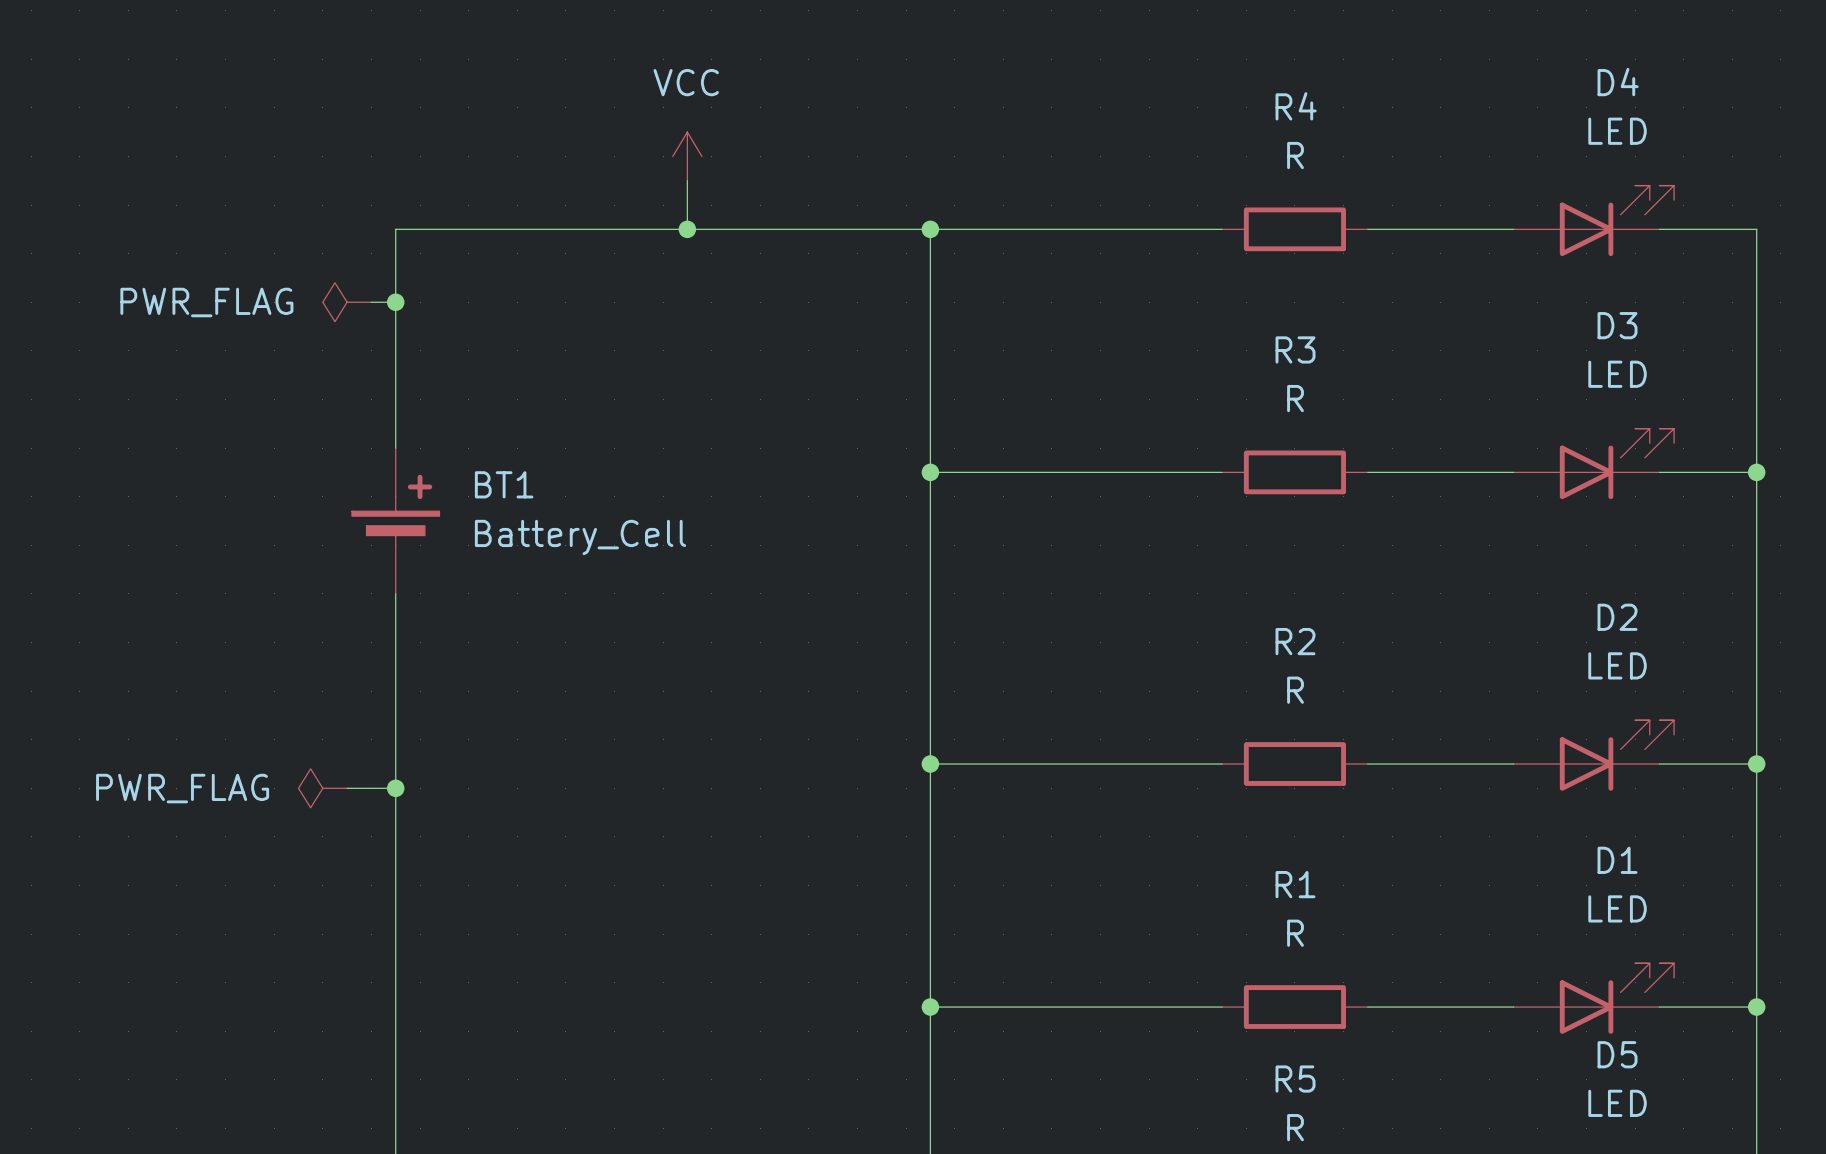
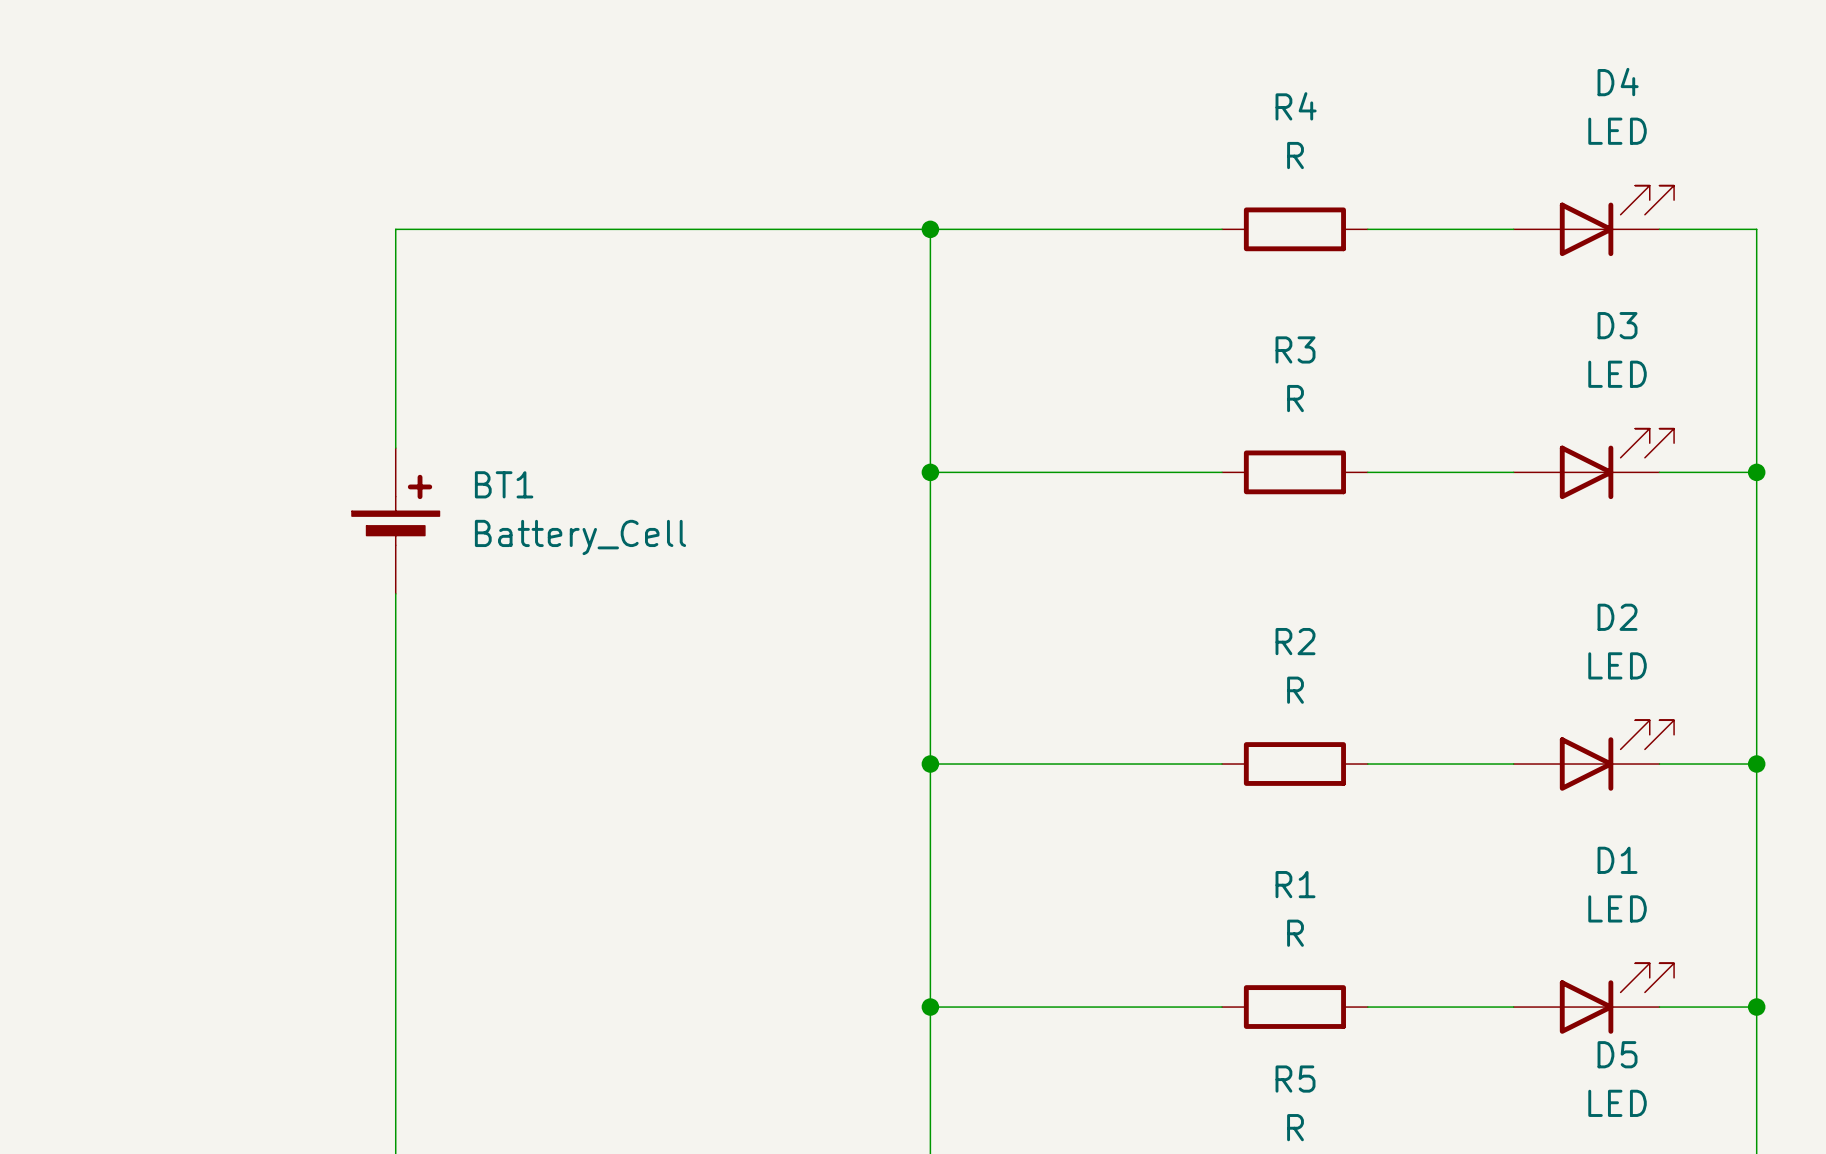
power symbol: VCC (687, 156) -> none
wire: (687, 180) (687, 229) -> none
junction: (687, 229) -> none
power symbol: PWR_FLAG (347, 302) -> none
wire: (371, 302) (395, 302) -> none
junction: (395, 302) -> none
power symbol: PWR_FLAG (322, 788) -> none
wire: (347, 788) (395, 788) -> none
junction: (395, 788) -> none

